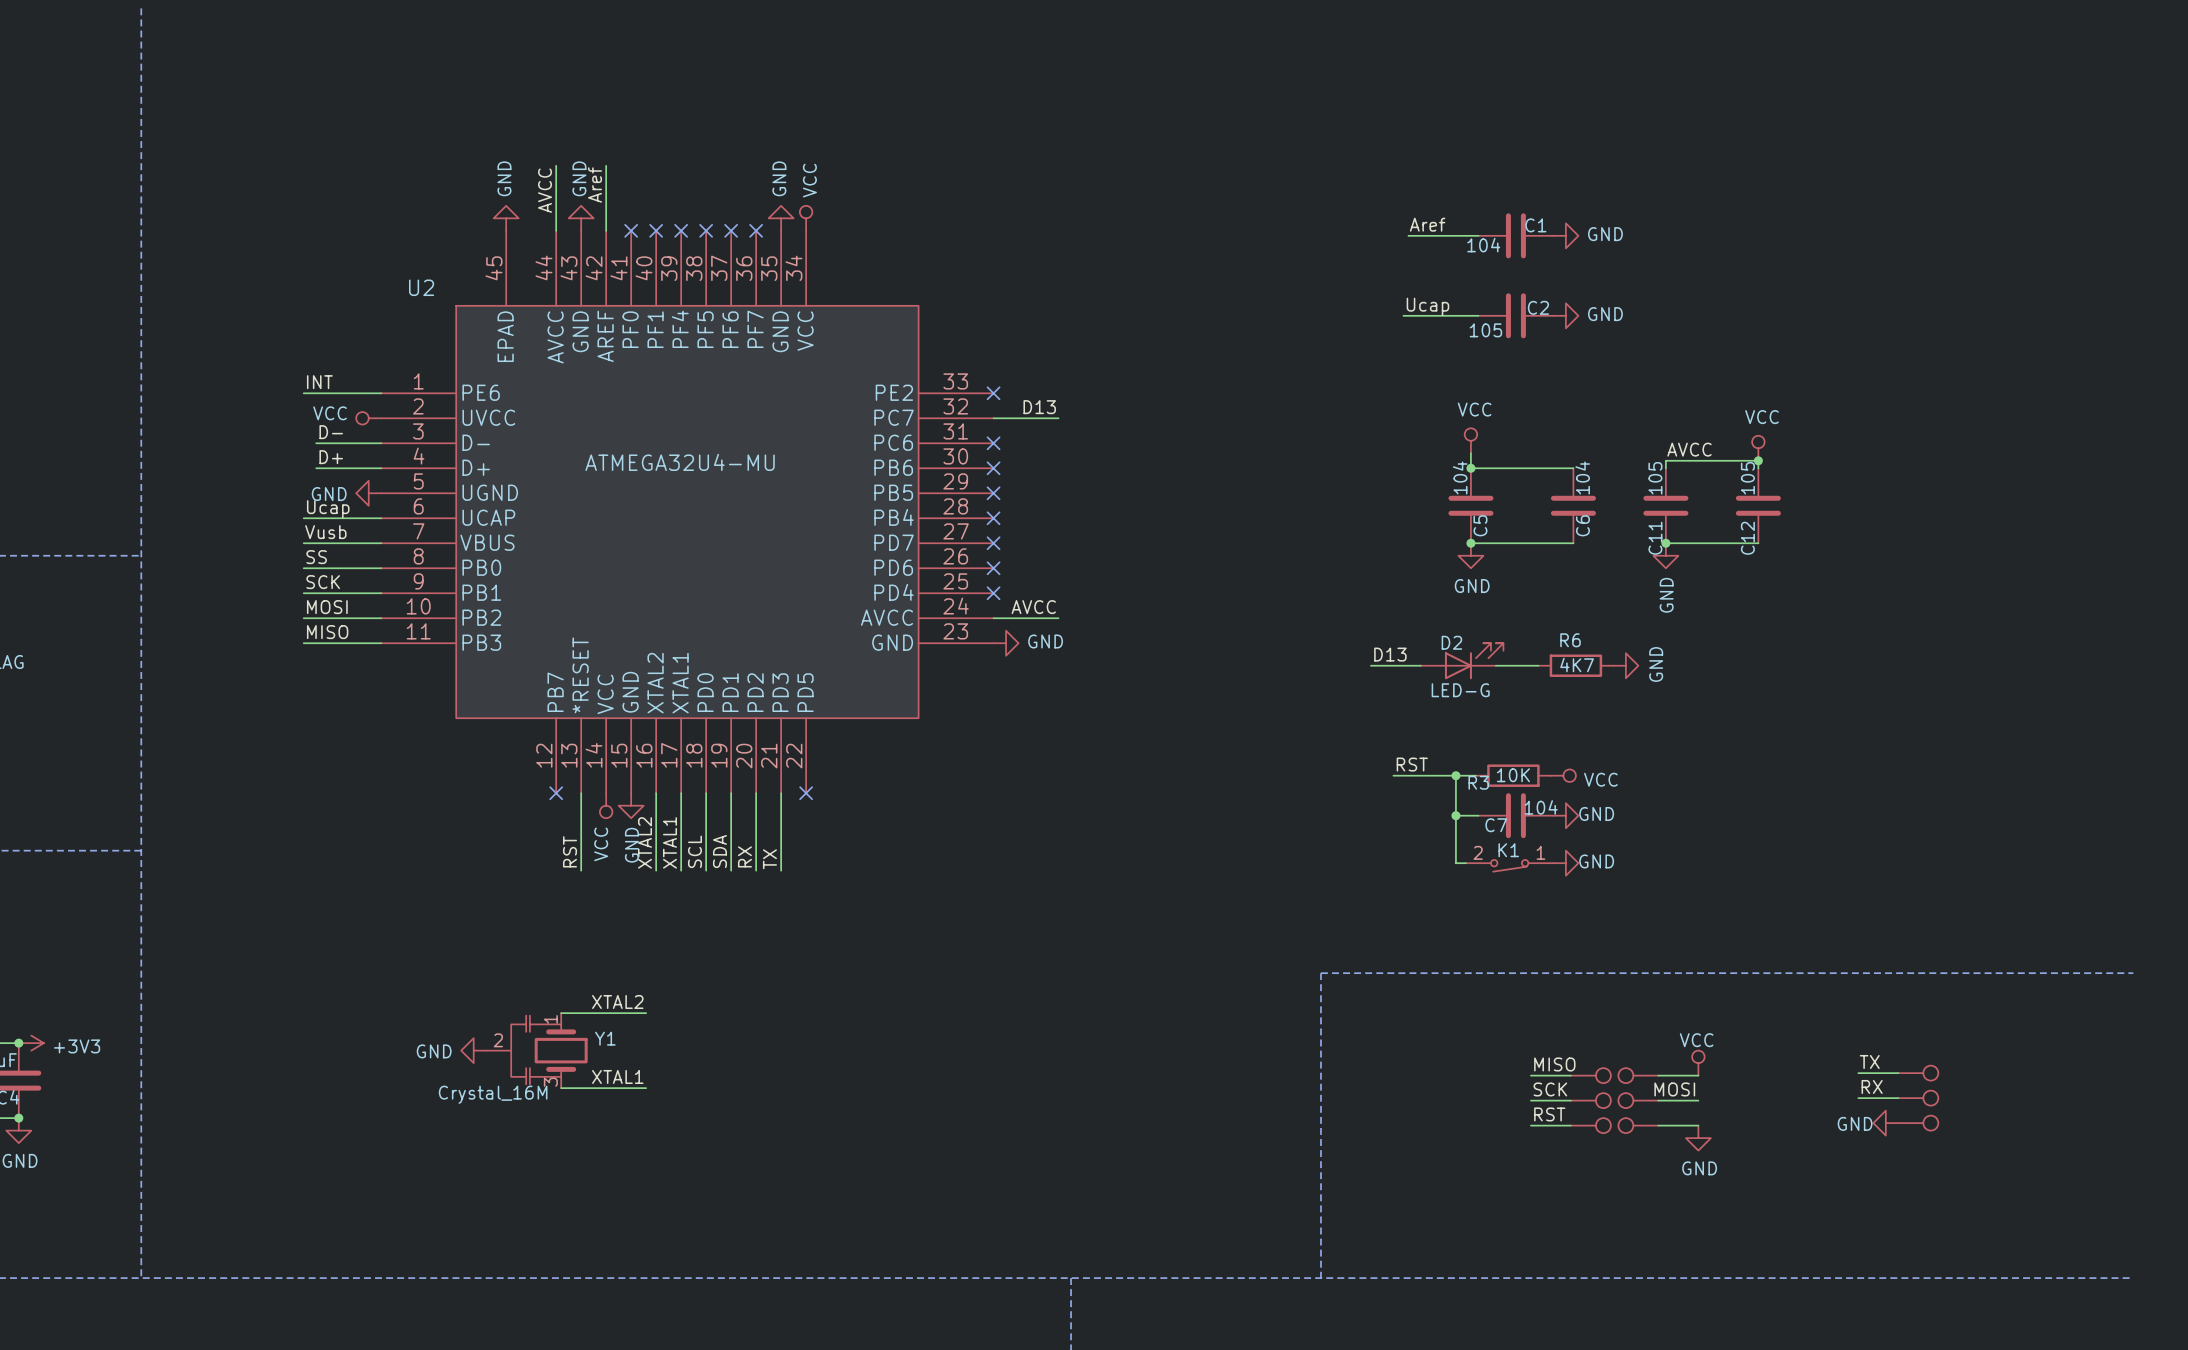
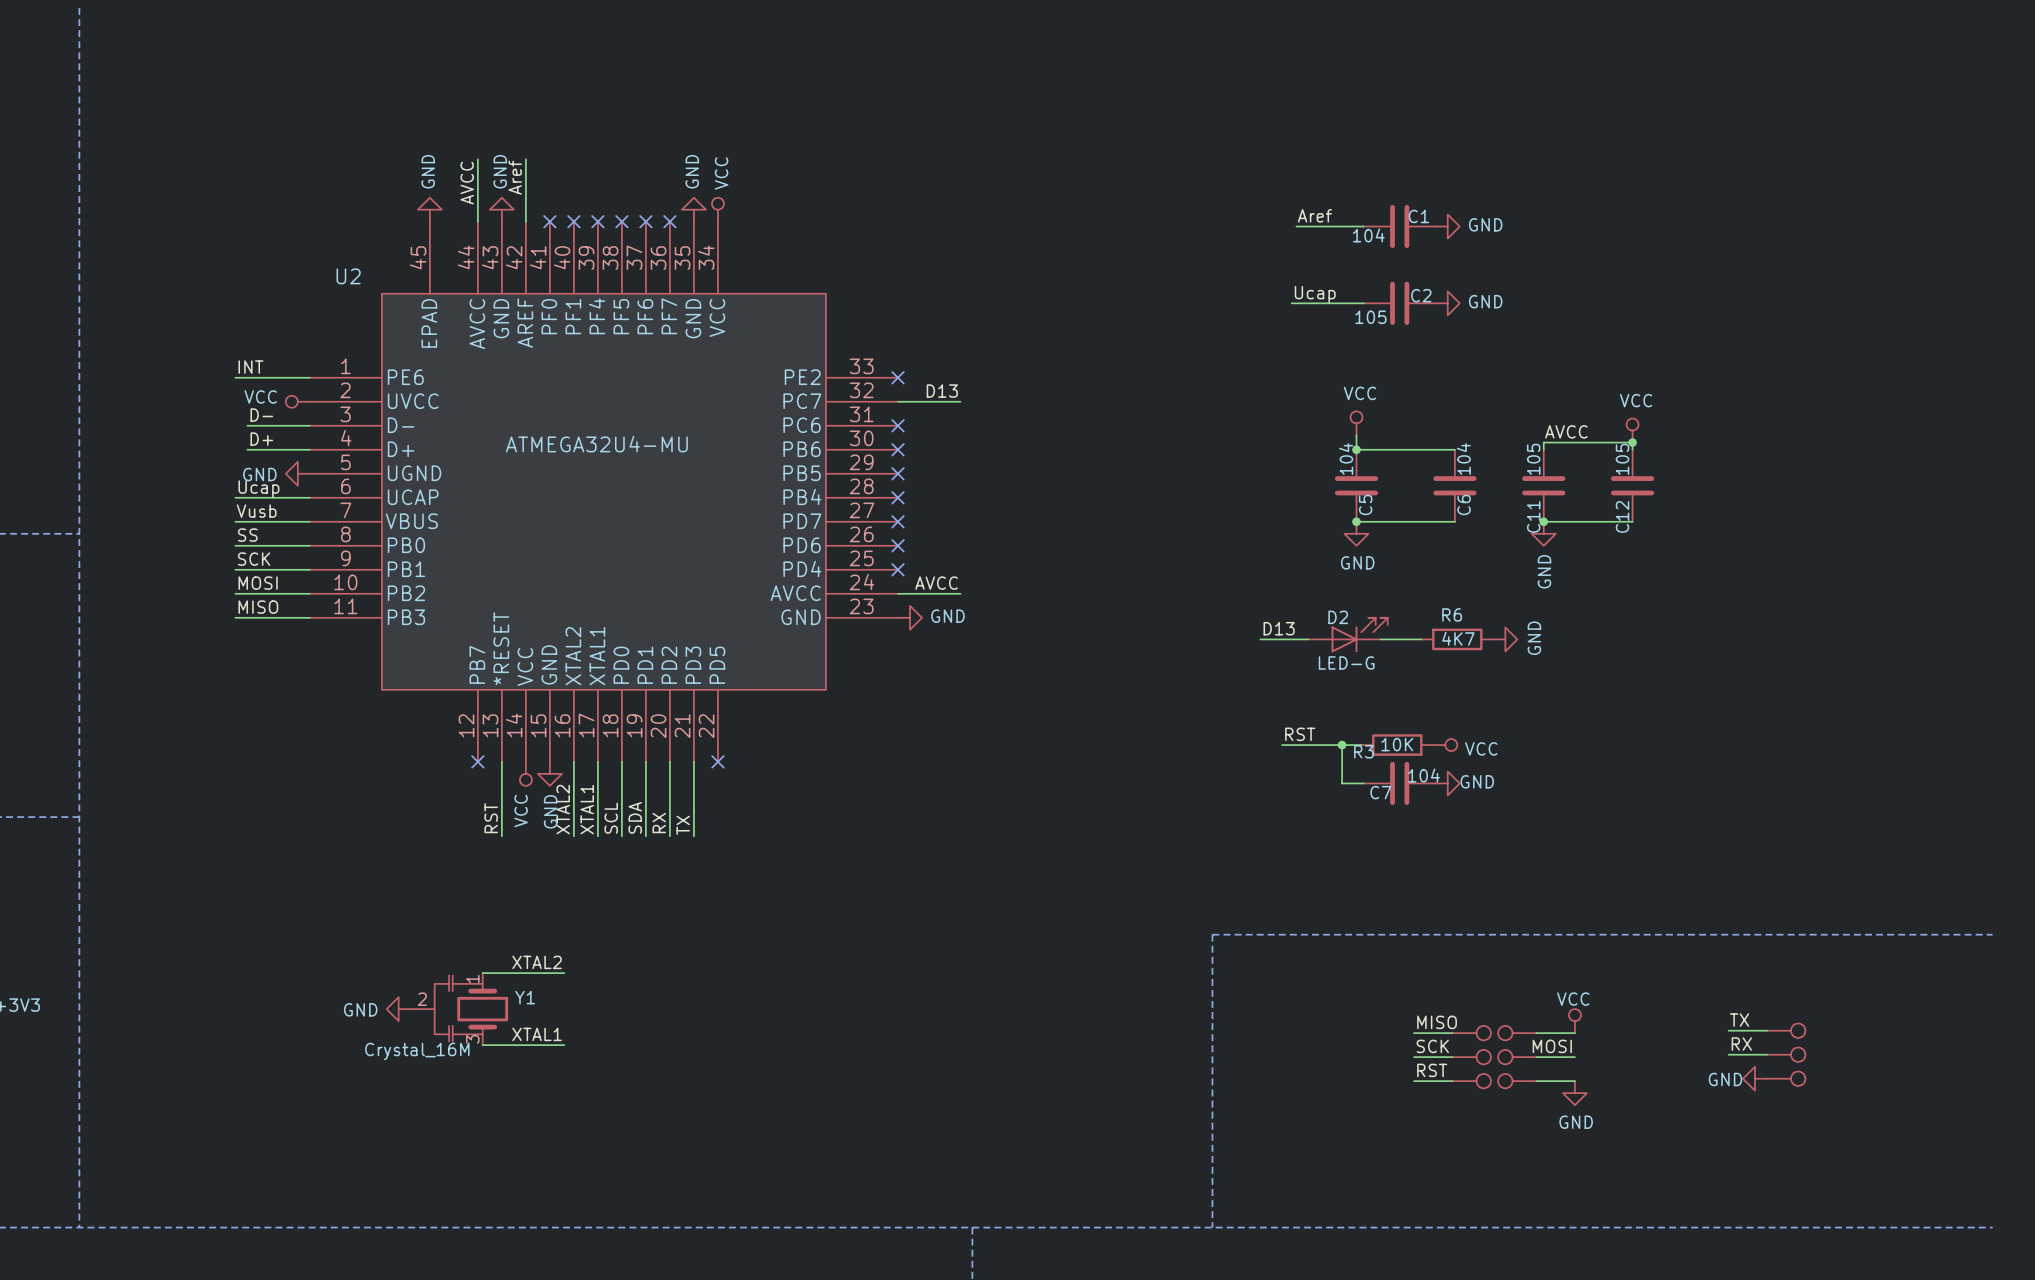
wire: (1455, 815) (1455, 863) (1465, 863) -> none
junction: (1455, 815) -> none
power symbol: GND (1565, 863) -> none
K1: (1509, 865) -> none

